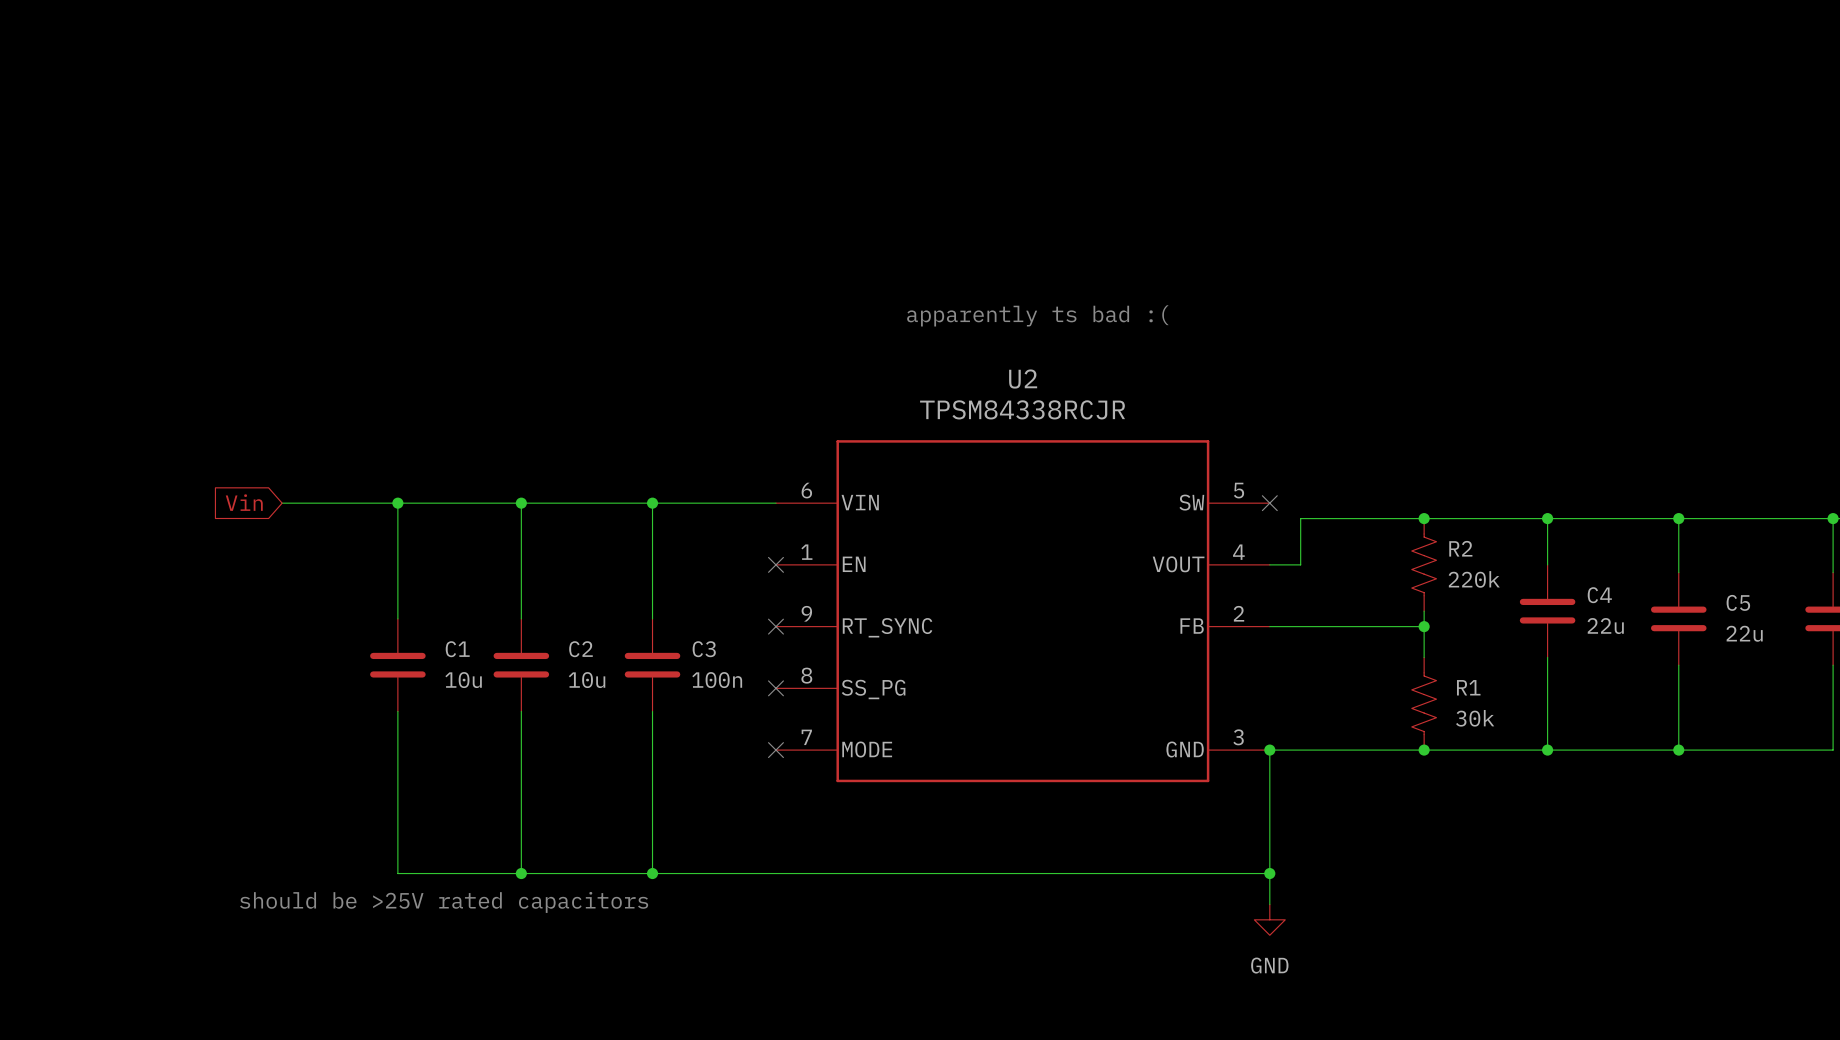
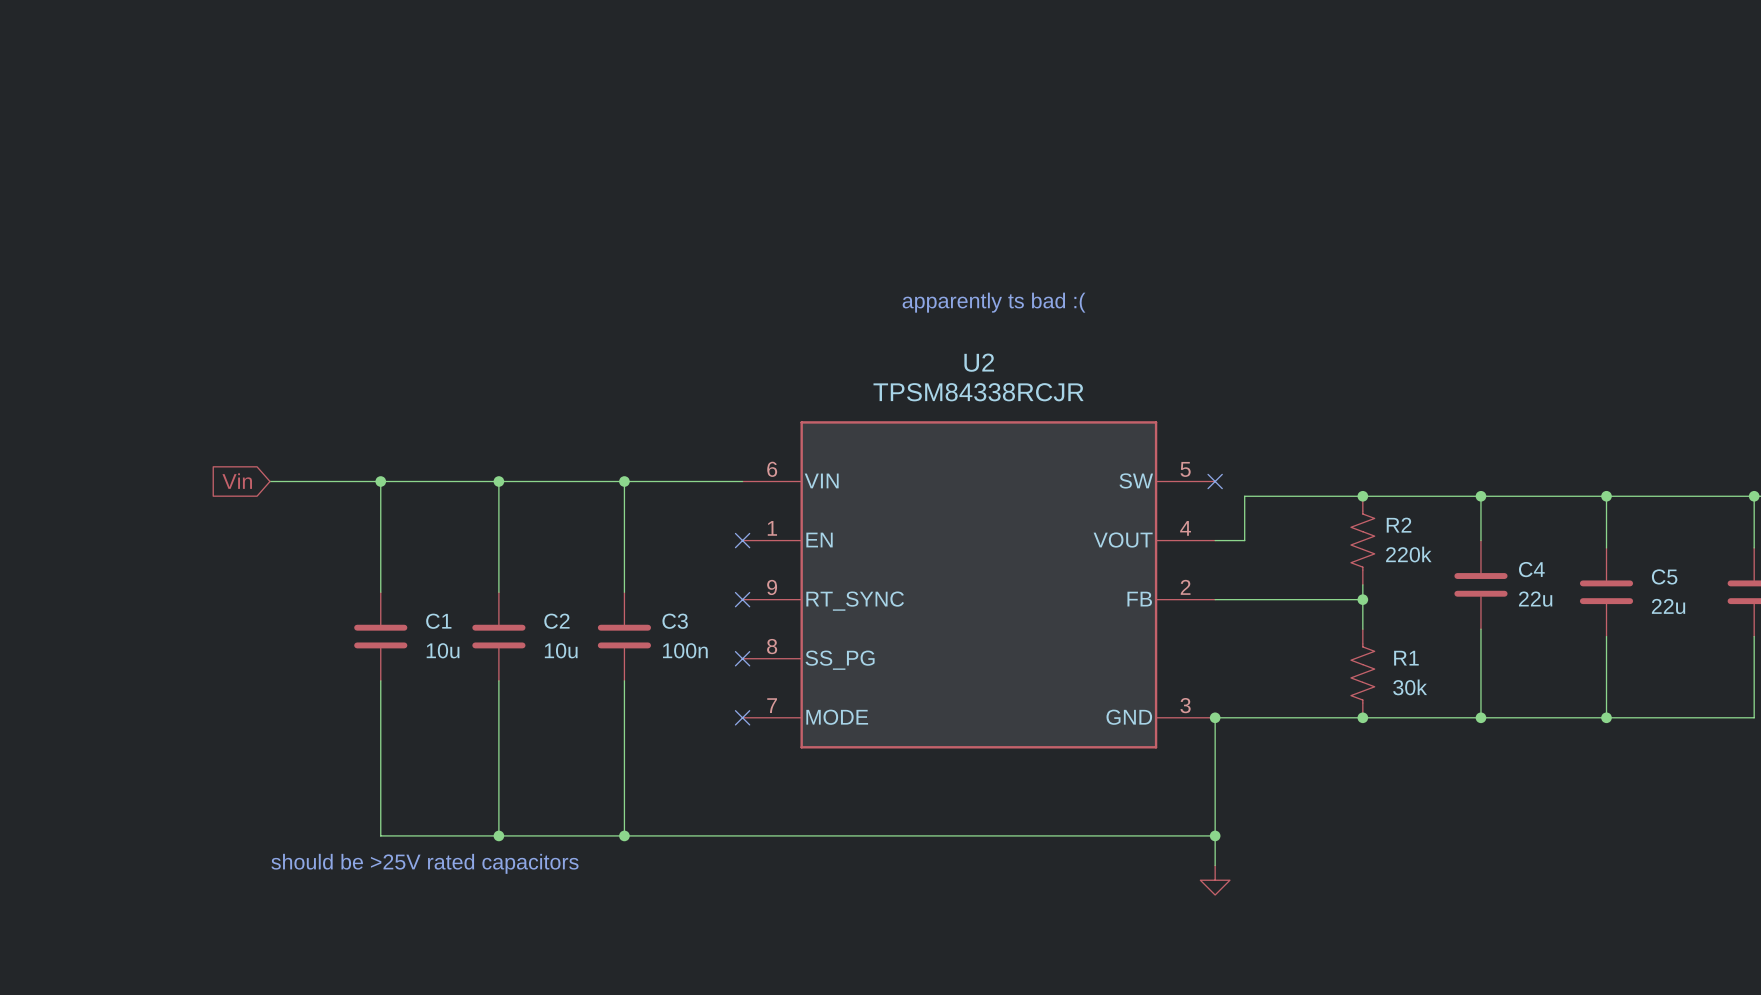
power symbol text: GND (1269, 965) -> none

